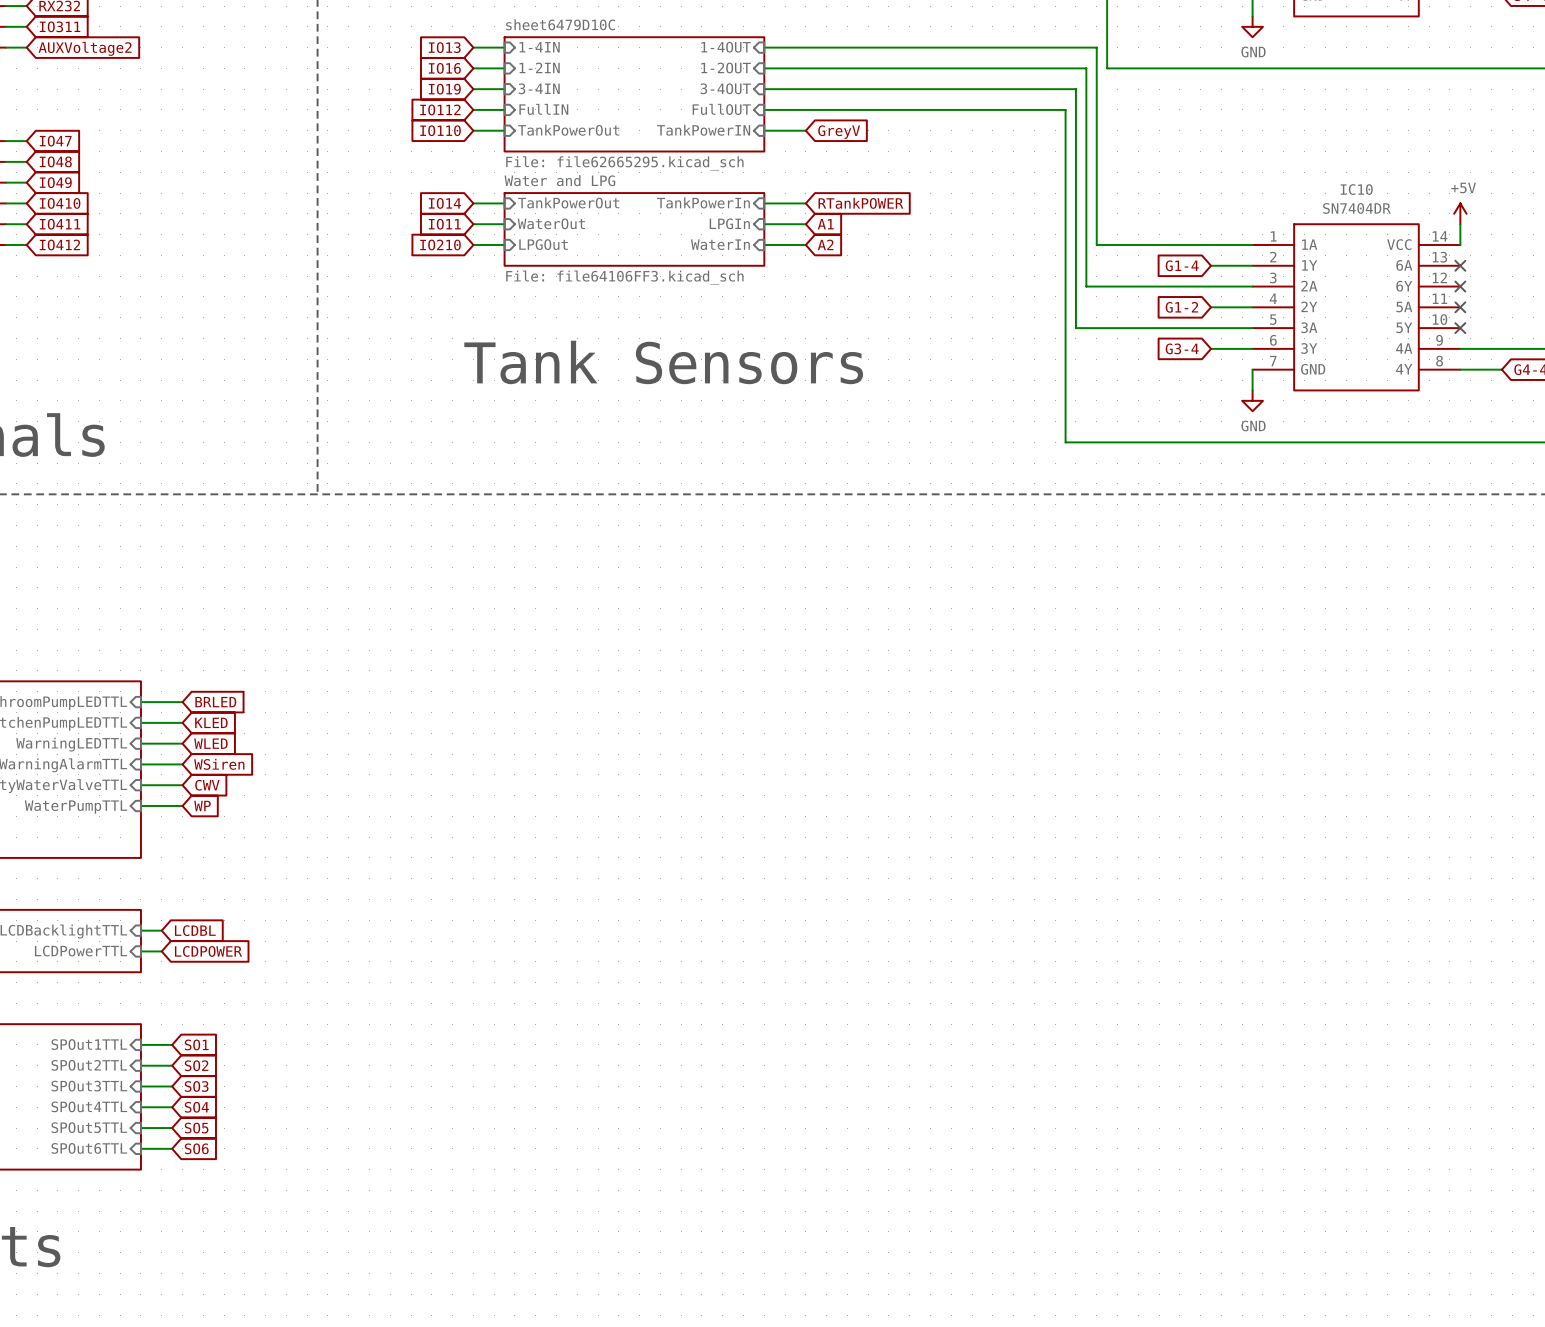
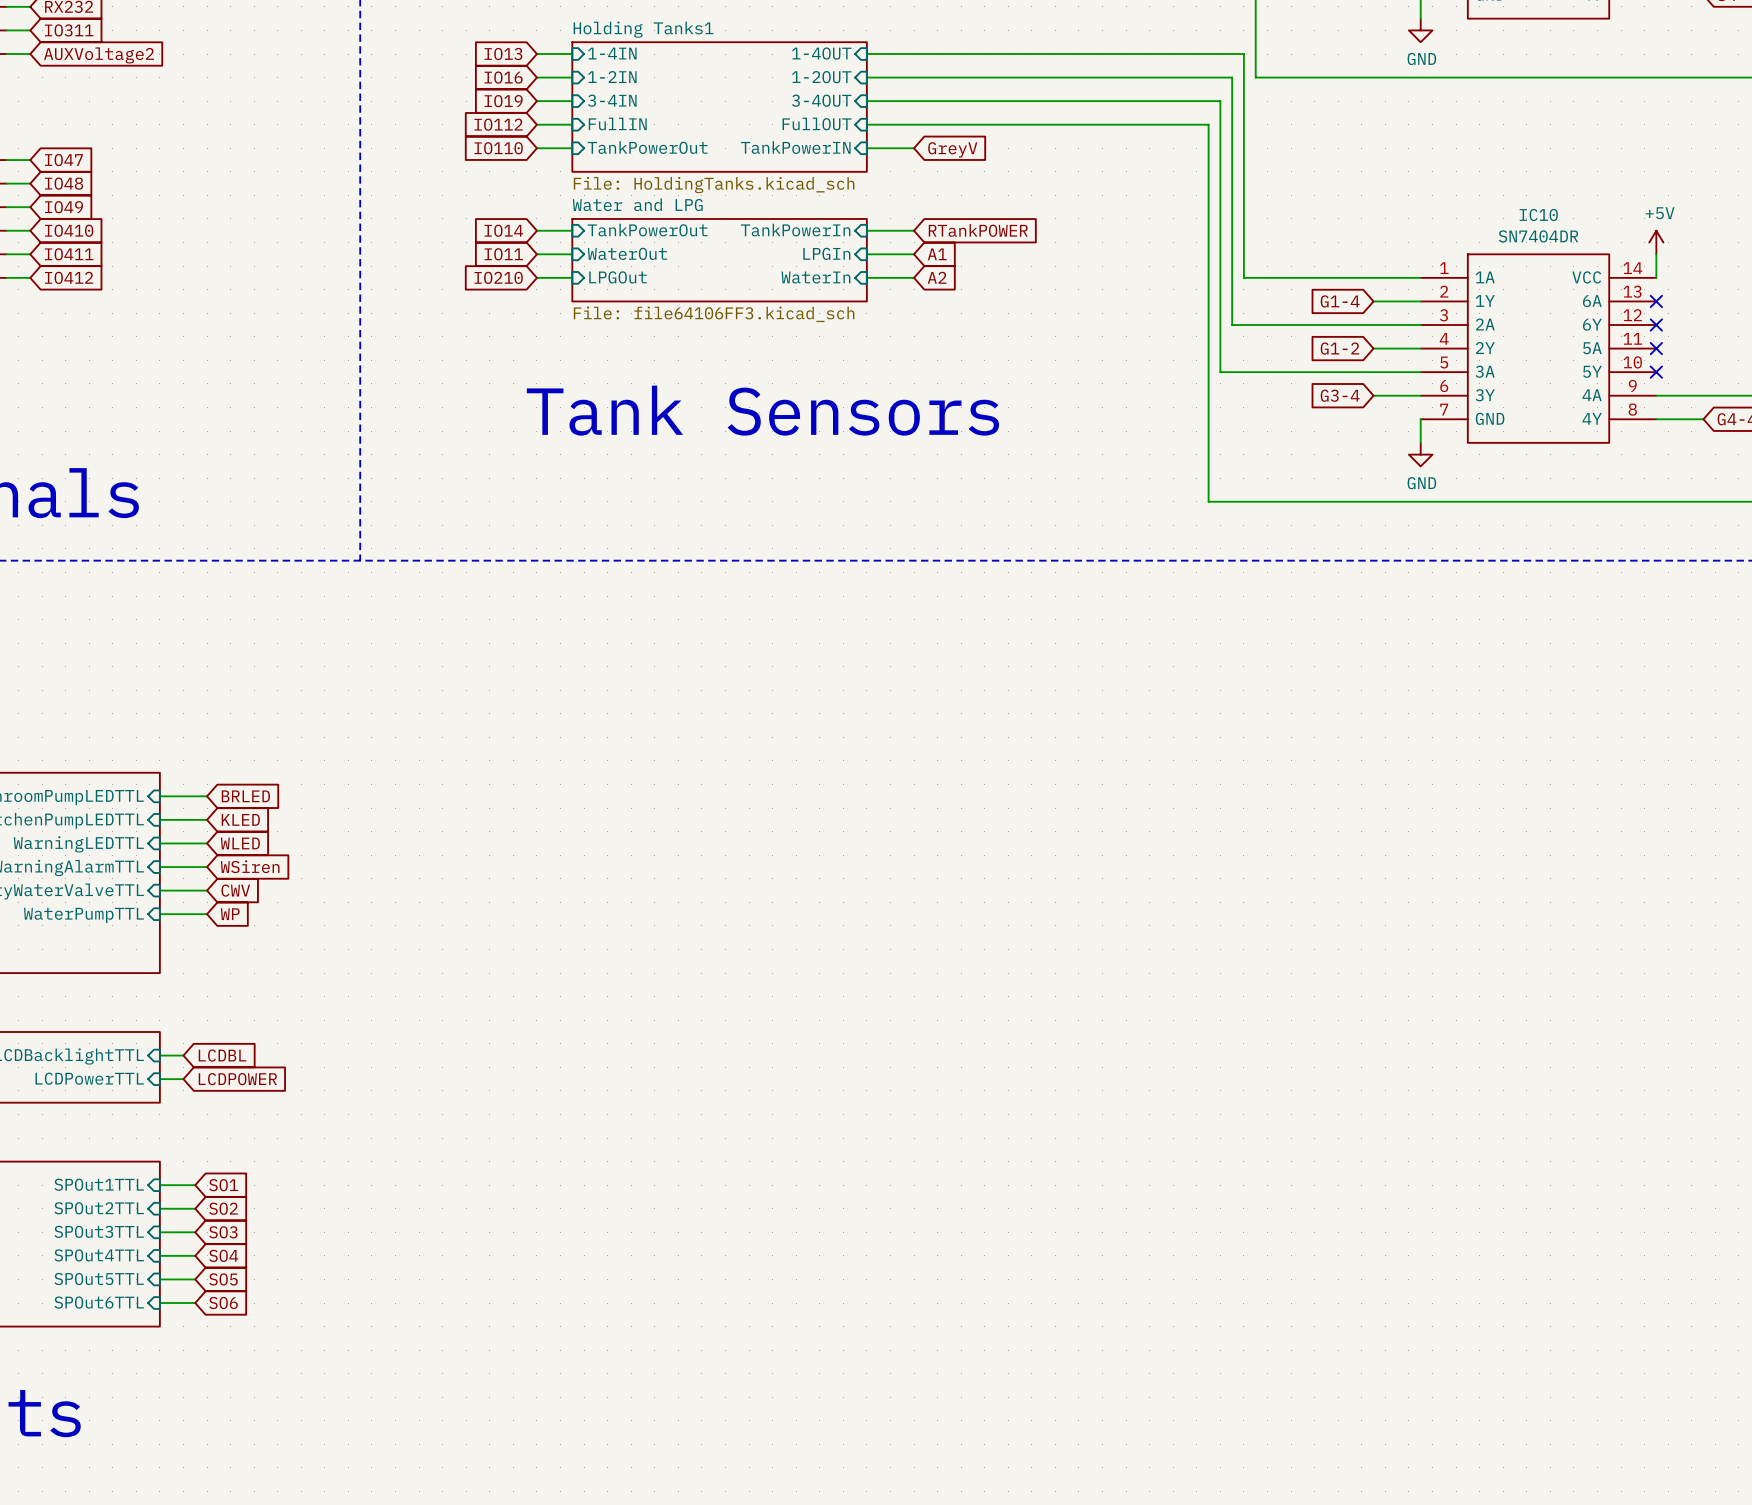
sheet sheet6479D10C name: sheet6479D10C (560, 24) -> Holding Tanks1 (643, 29)
sheet sheet6479D10C value: File: file62665295.kicad_sch (624, 163) -> File: HoldingTanks.kicad_sch (714, 185)

